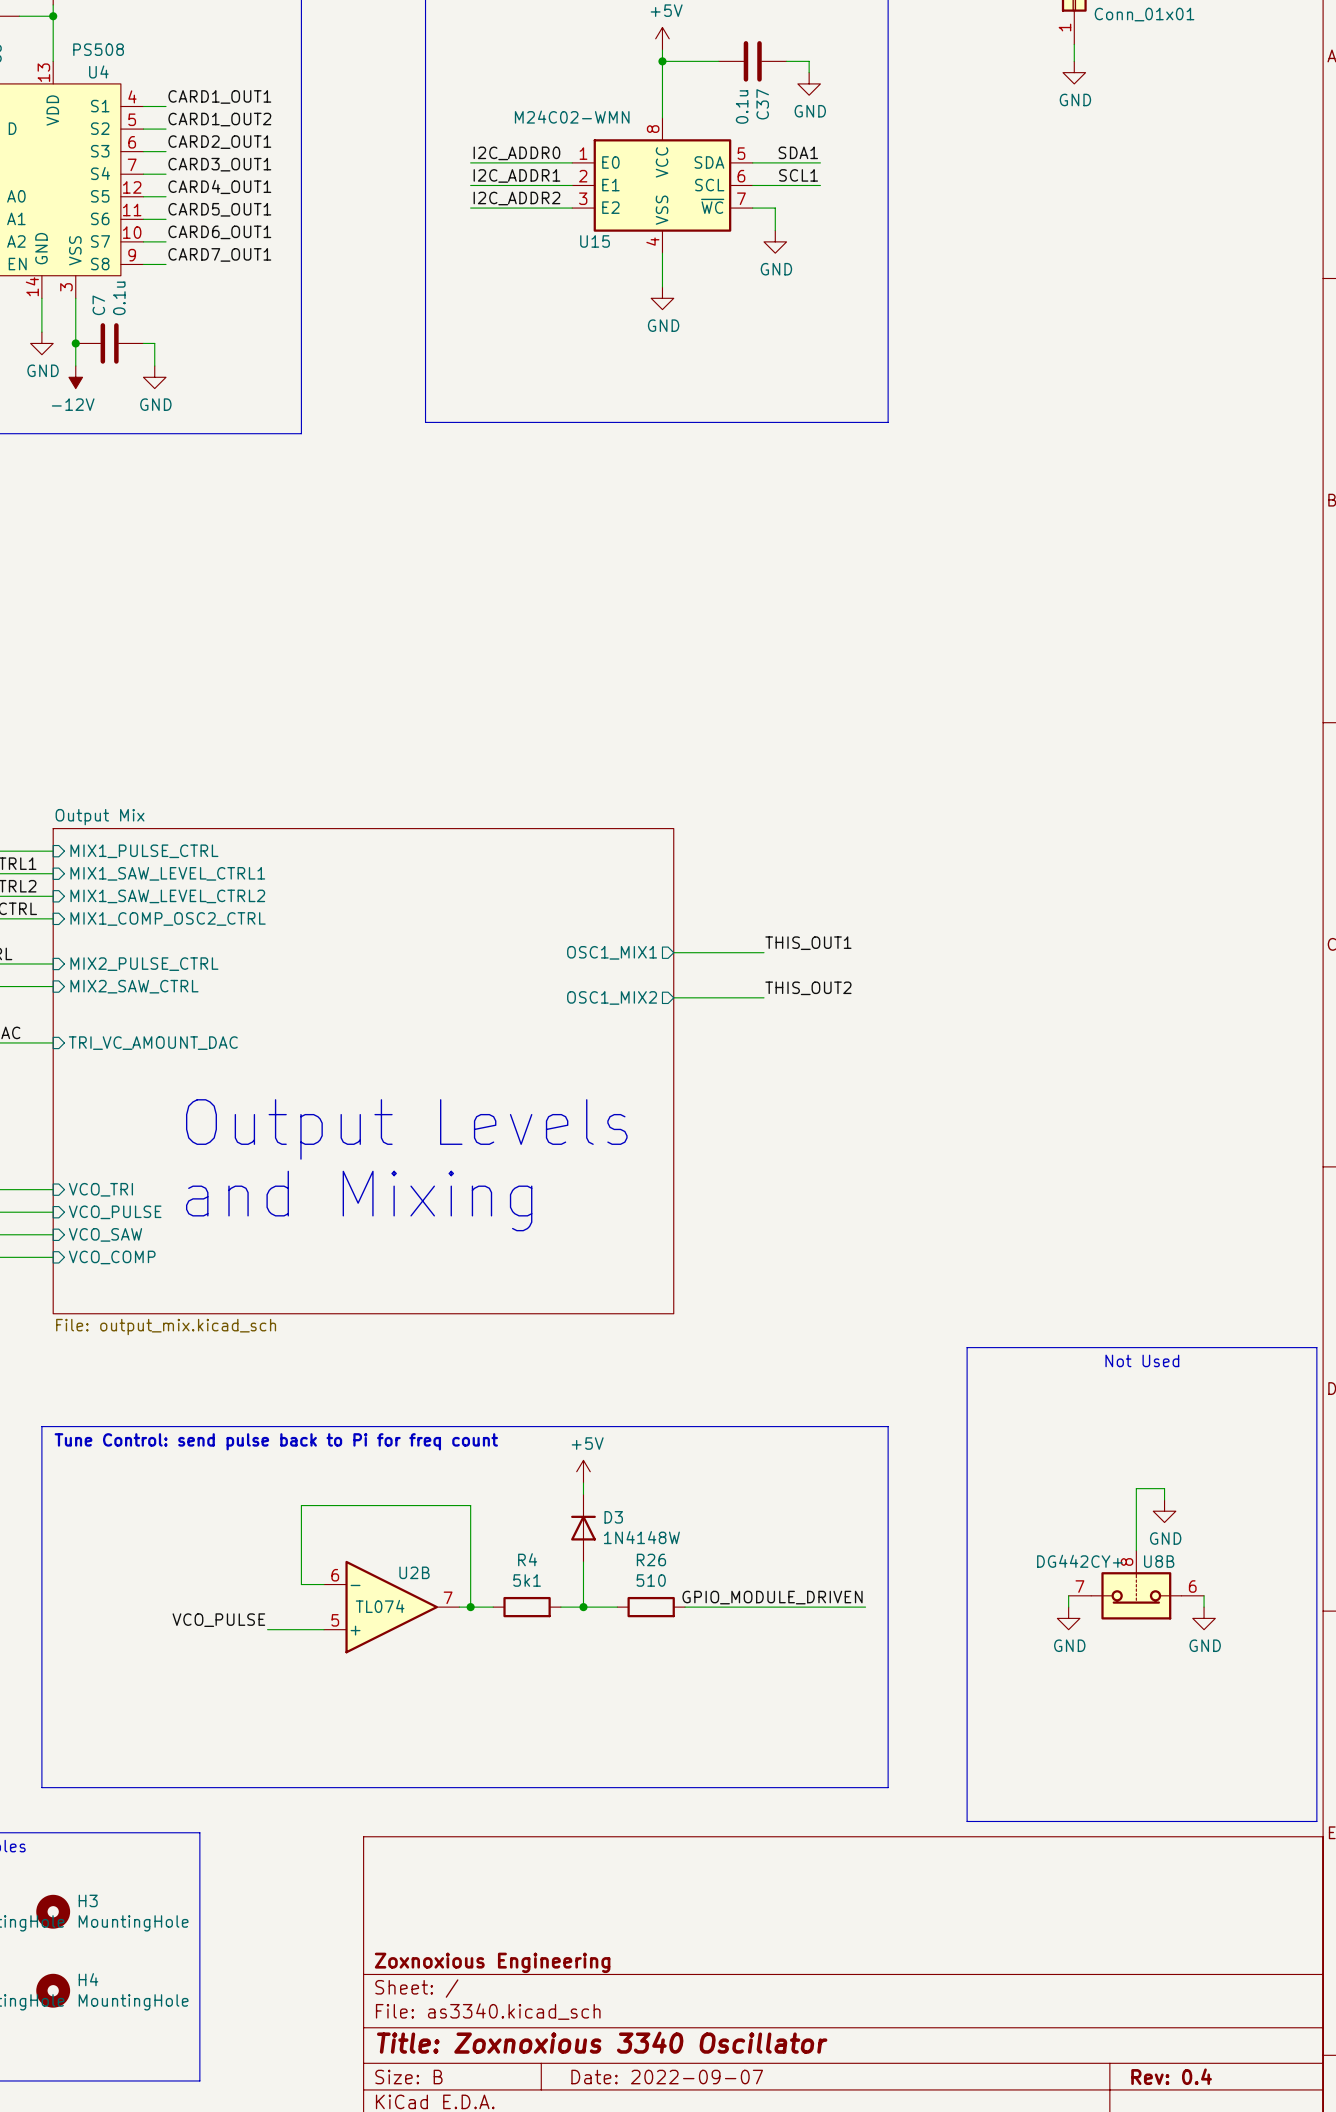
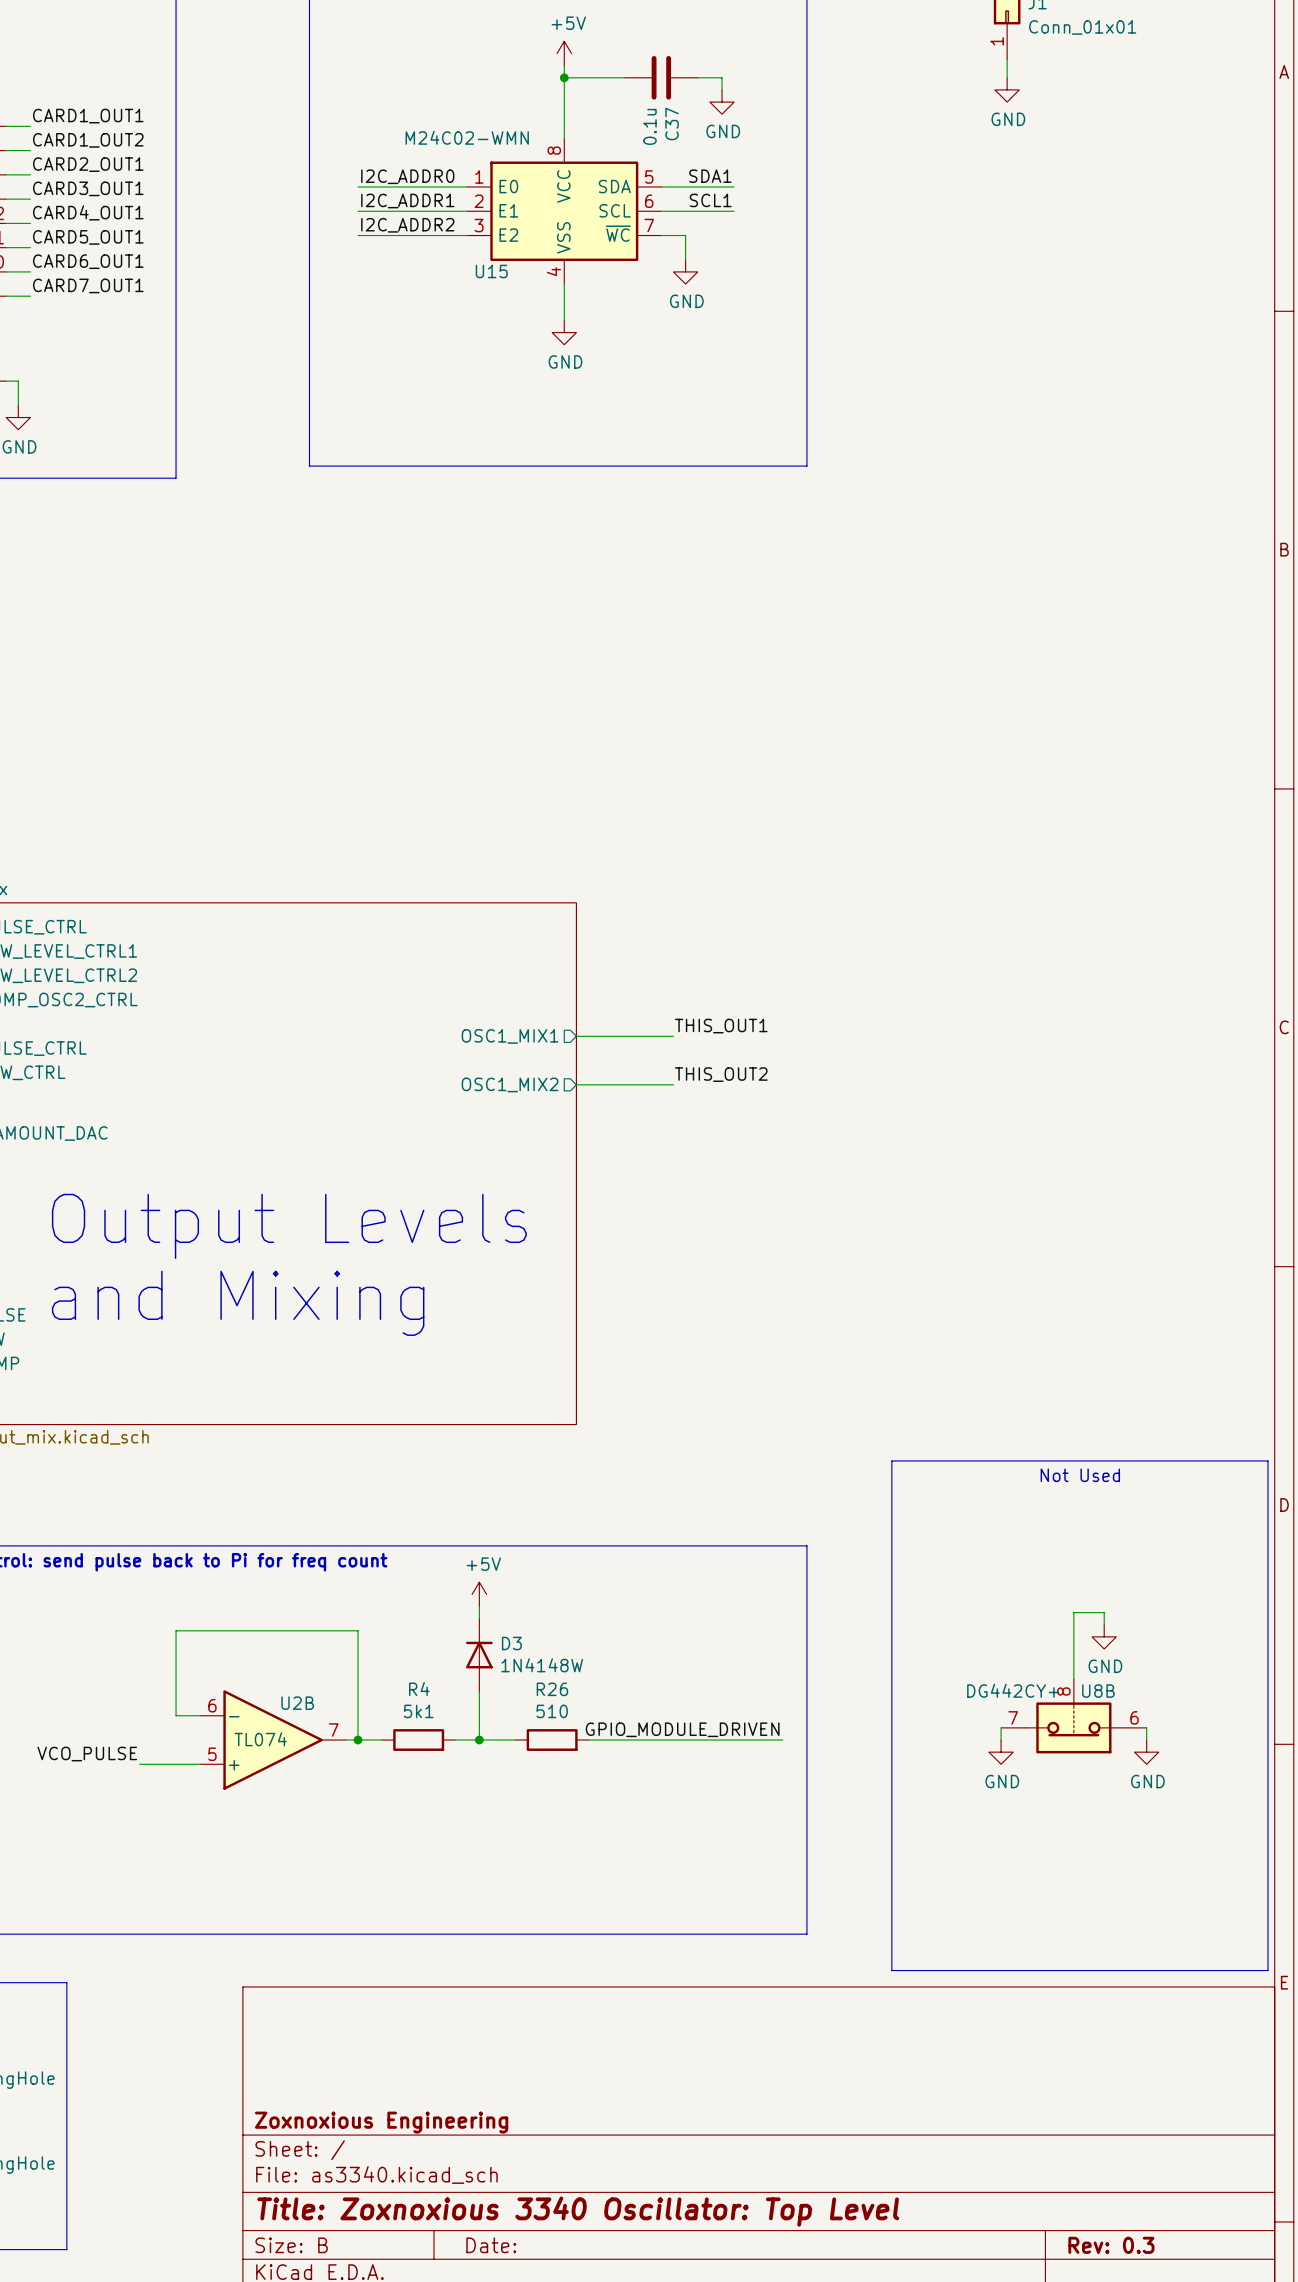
title block: Title: Zoxnoxious 3340 Oscillator (602, 2042) -> Title: Zoxnoxious 3340 Oscillator: Top Level (578, 2211)
title block: Rev: 0.4 (1171, 2076) -> Rev: 0.3 (1111, 2245)
title block: Date: 2022-09-07 (667, 2077) -> Date: (491, 2245)

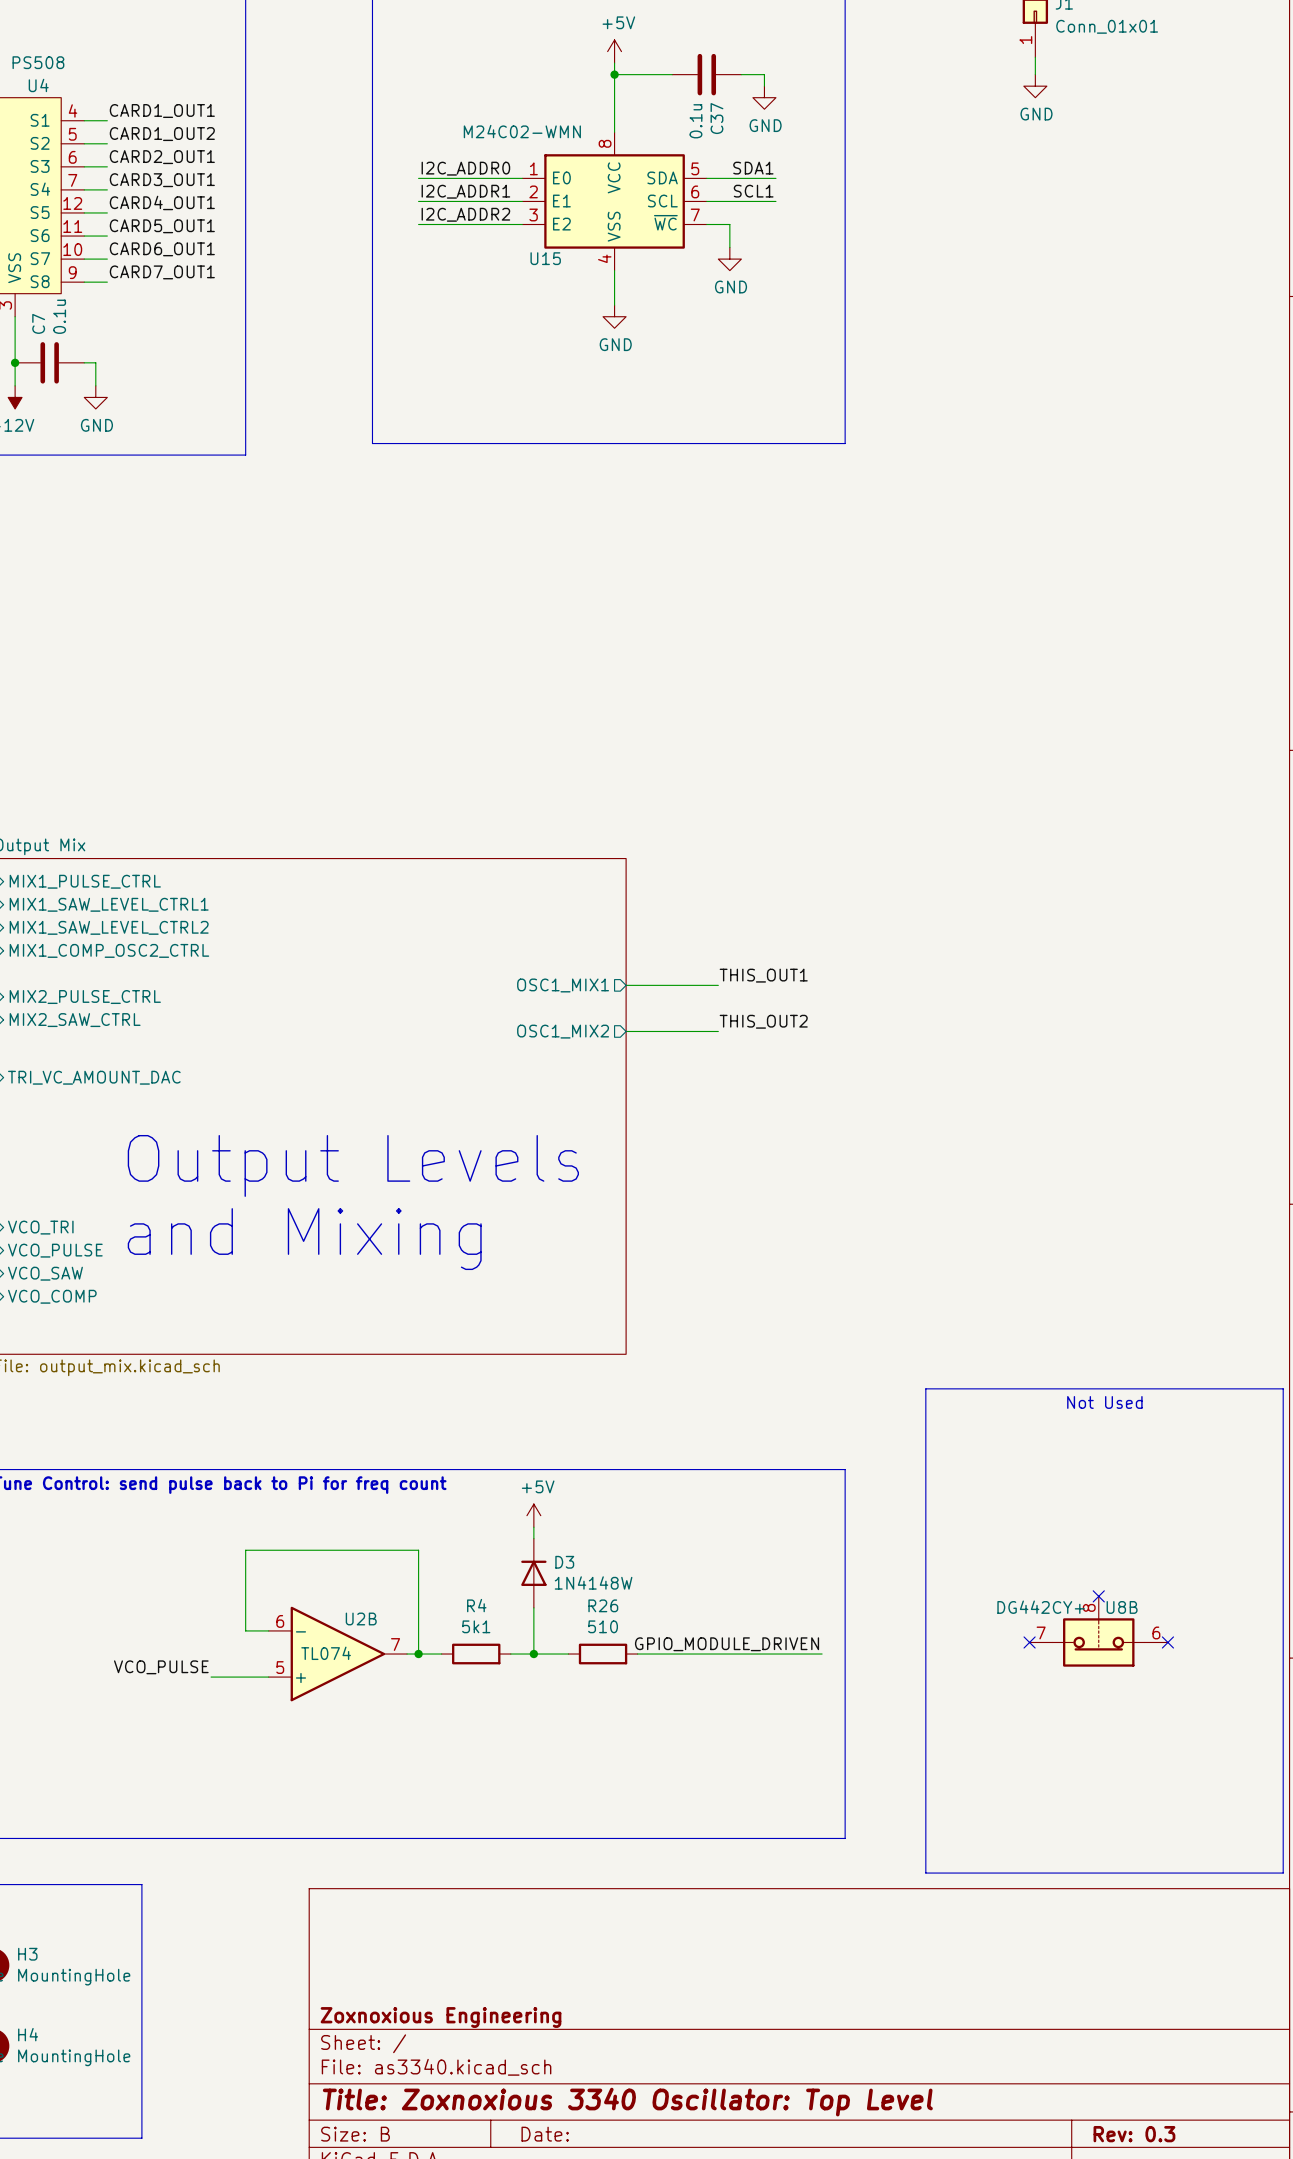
wire: (1104, 1624) (1104, 1612) (1073, 1612) (1073, 1679) -> none
power symbol: GND (1104, 1636) -> none
no-connect mark: none -> (1098, 1596)
wire: (1001, 1727) (1001, 1740) -> none
no-connect mark: none -> (1029, 1642)
wire: (1146, 1727) (1146, 1740) -> none
no-connect mark: none -> (1167, 1642)
power symbol: GND (1001, 1752) -> none
power symbol: GND (1146, 1752) -> none

